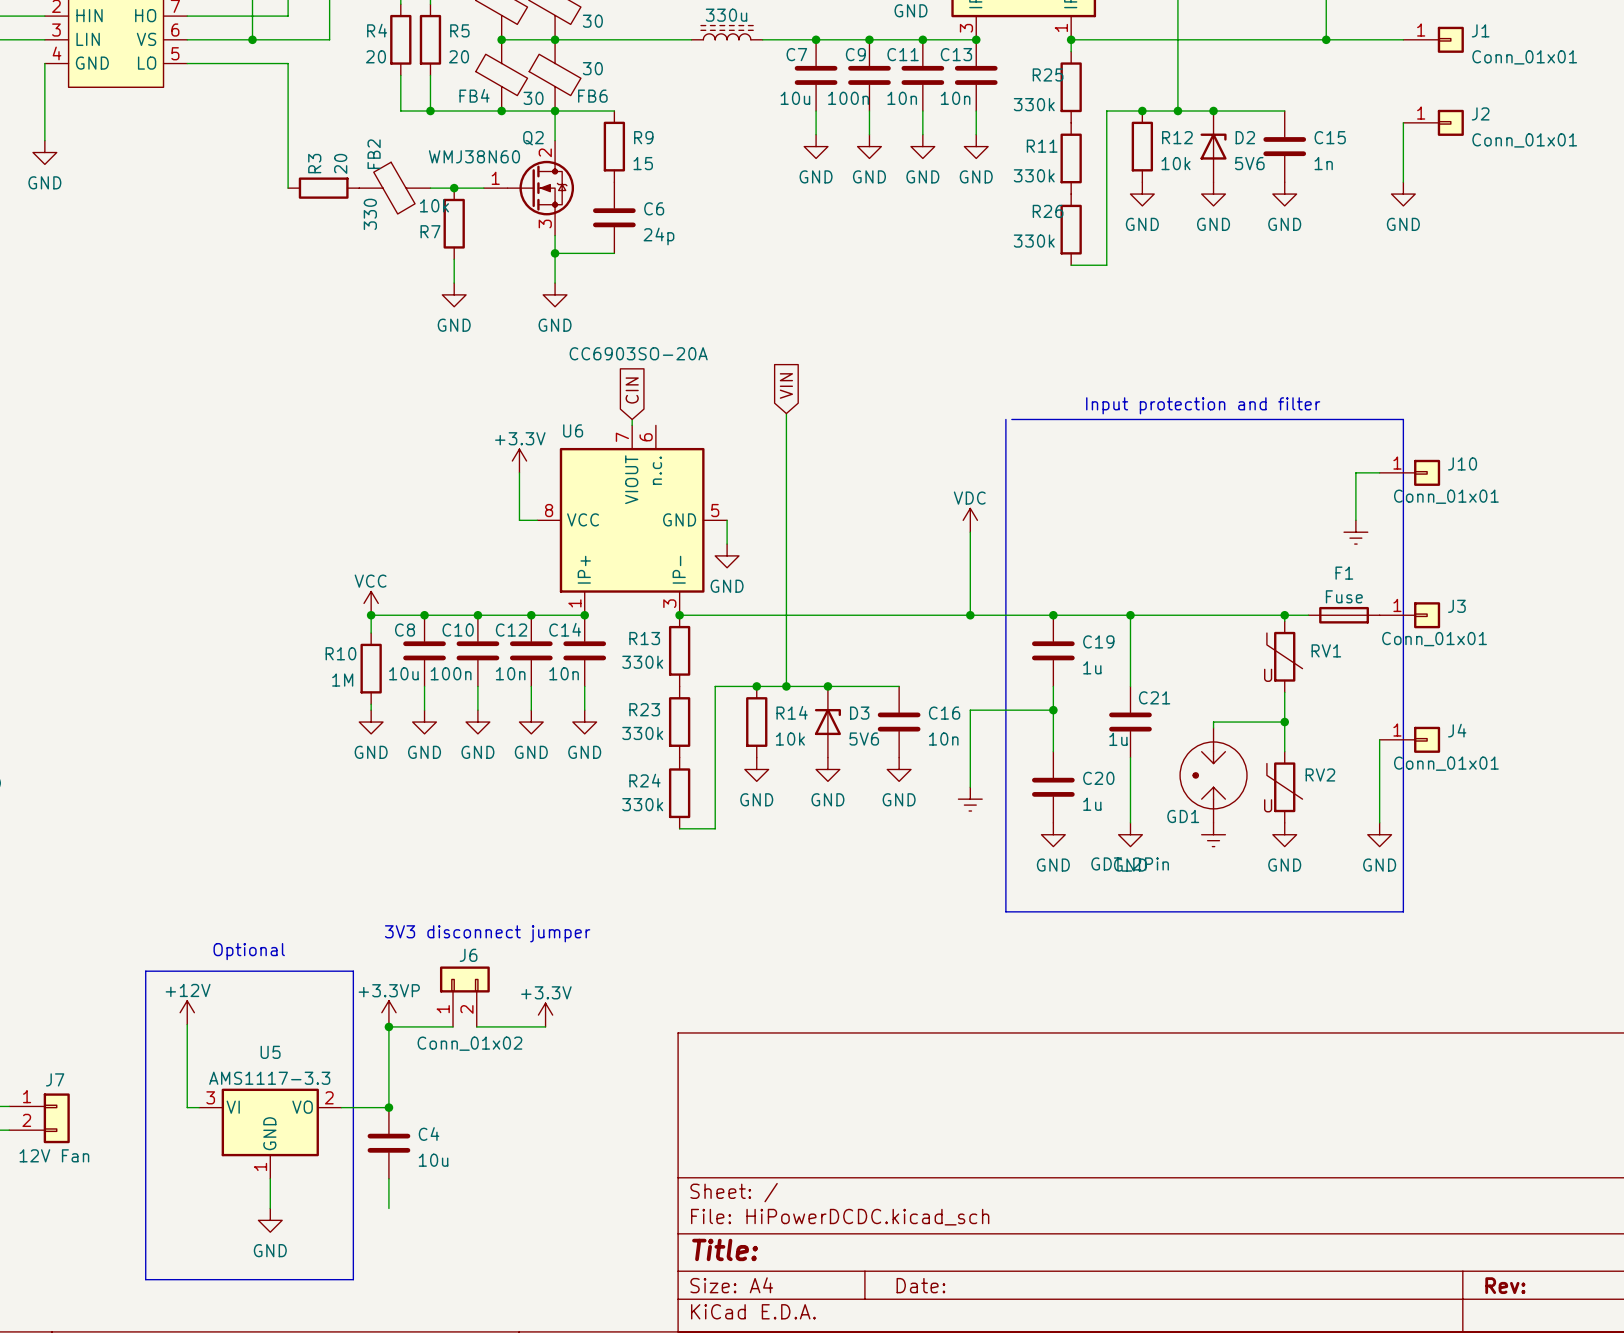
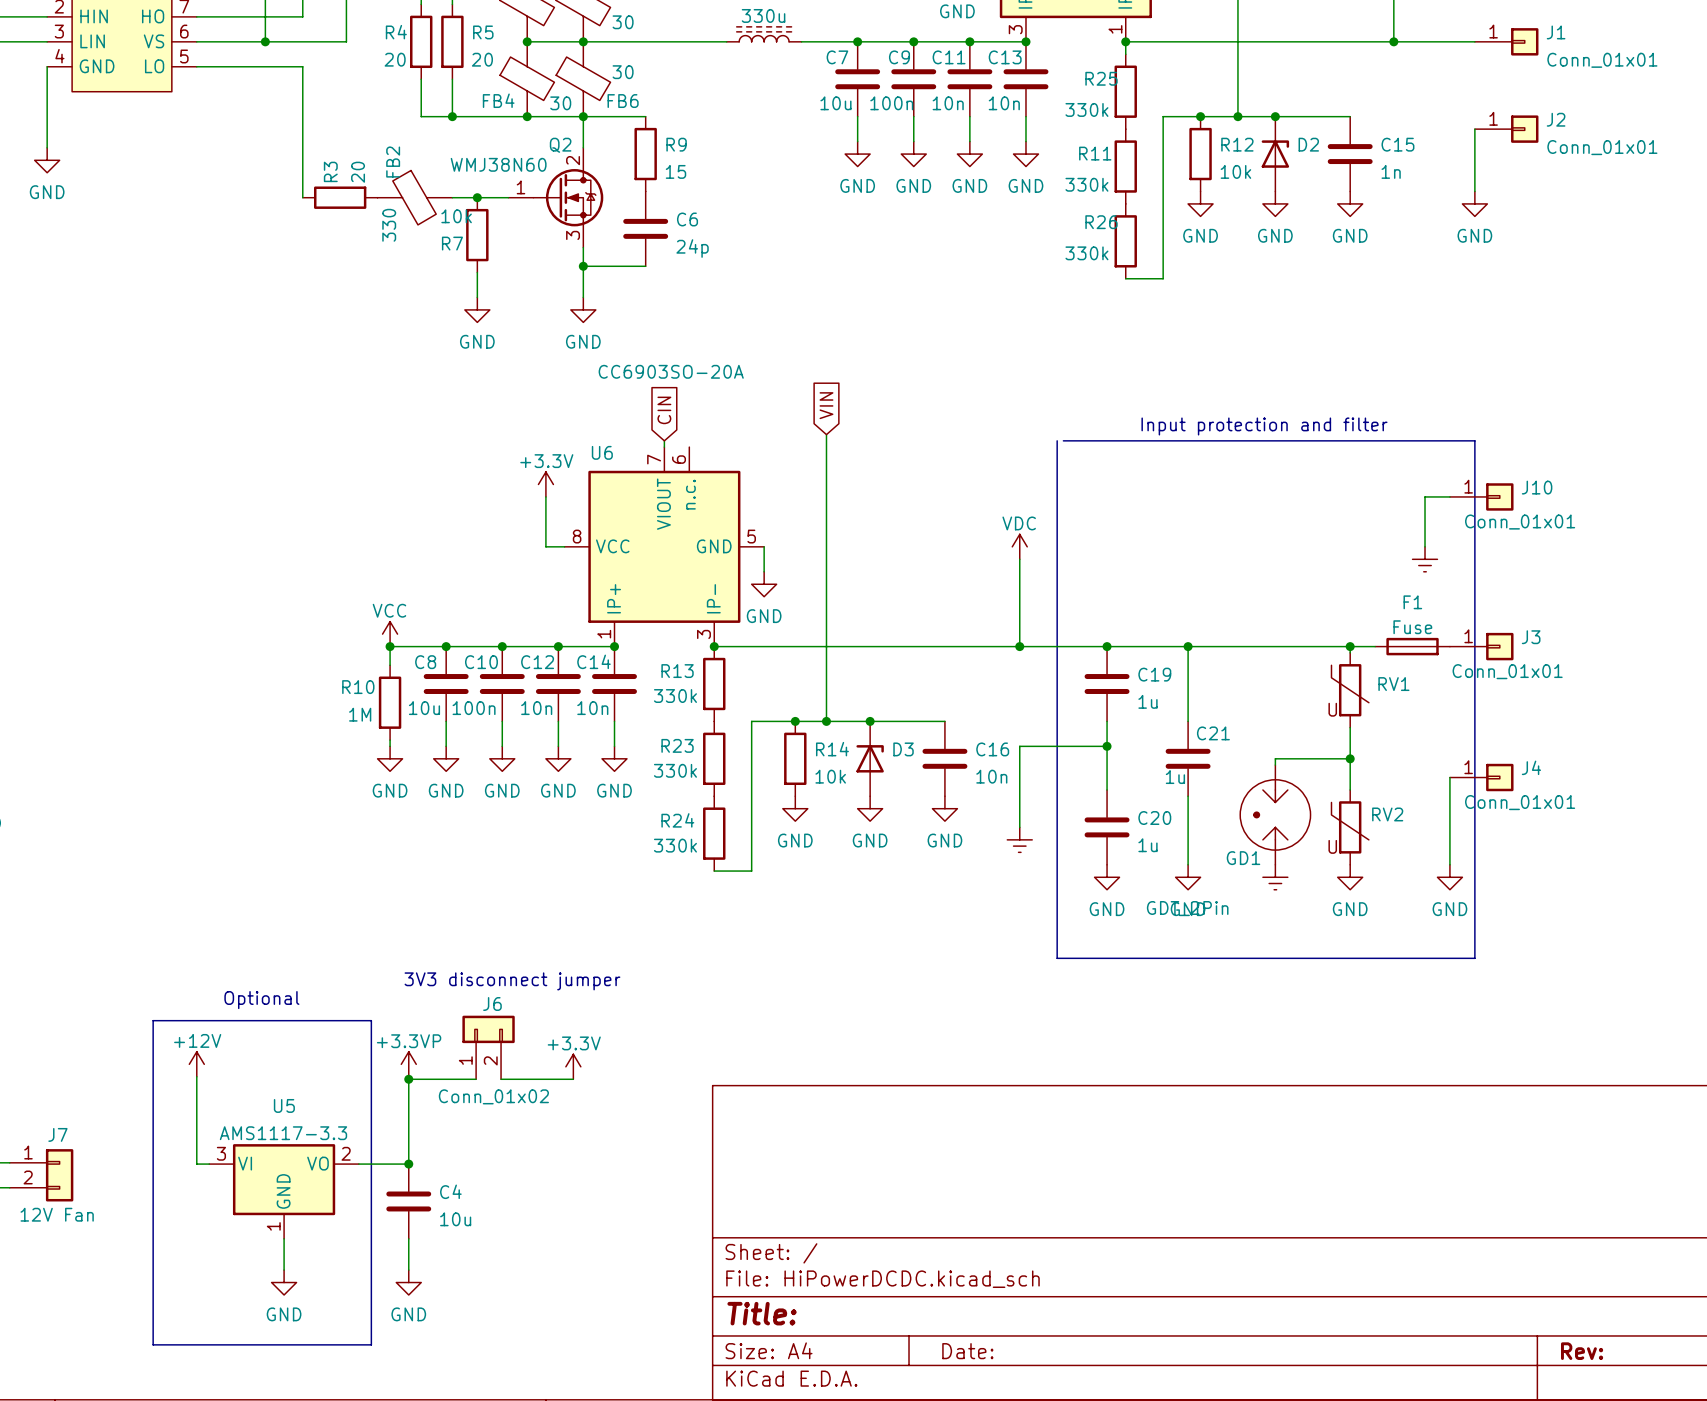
D2 value: 5V6 (1249, 163) -> none
D3 value: 5V6 (864, 739) -> none
power symbol: none -> GND (408, 1282)

